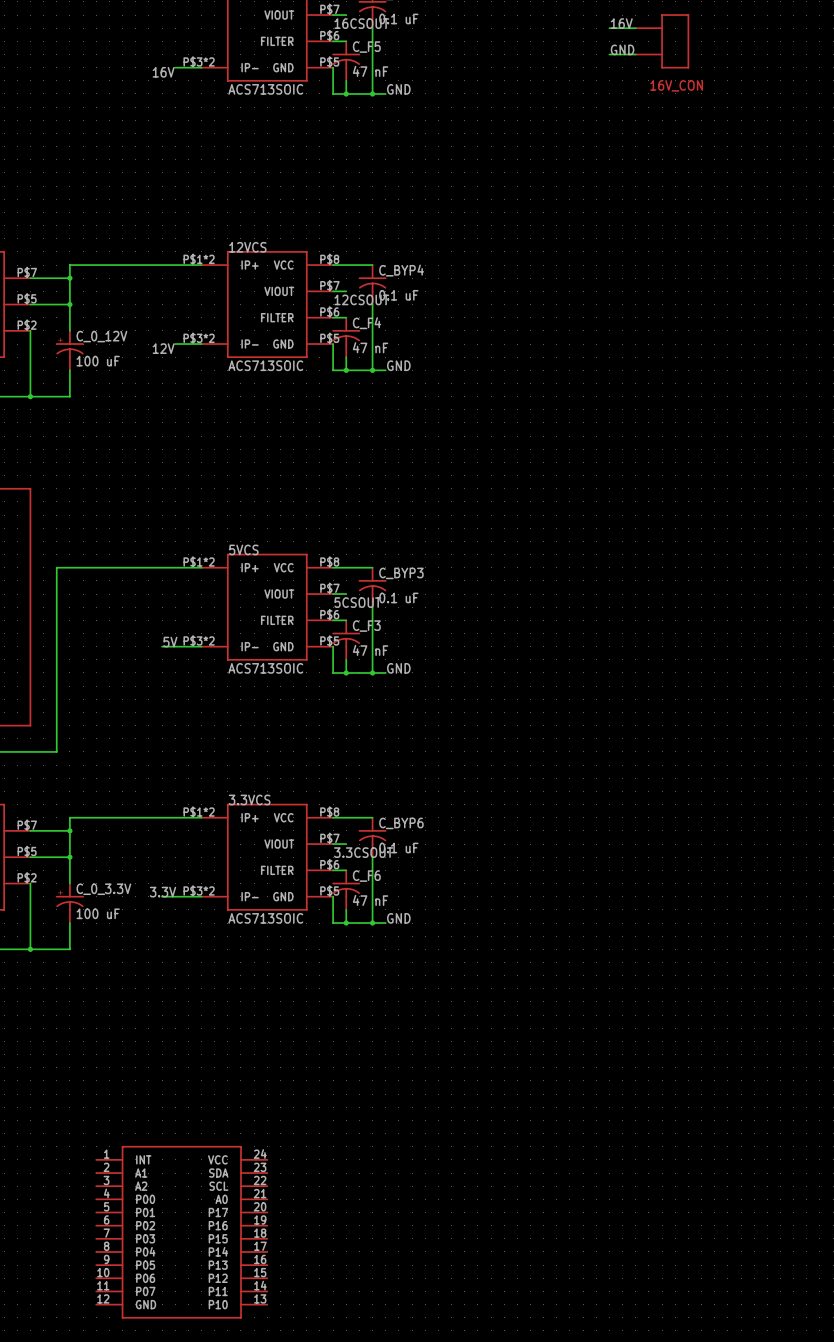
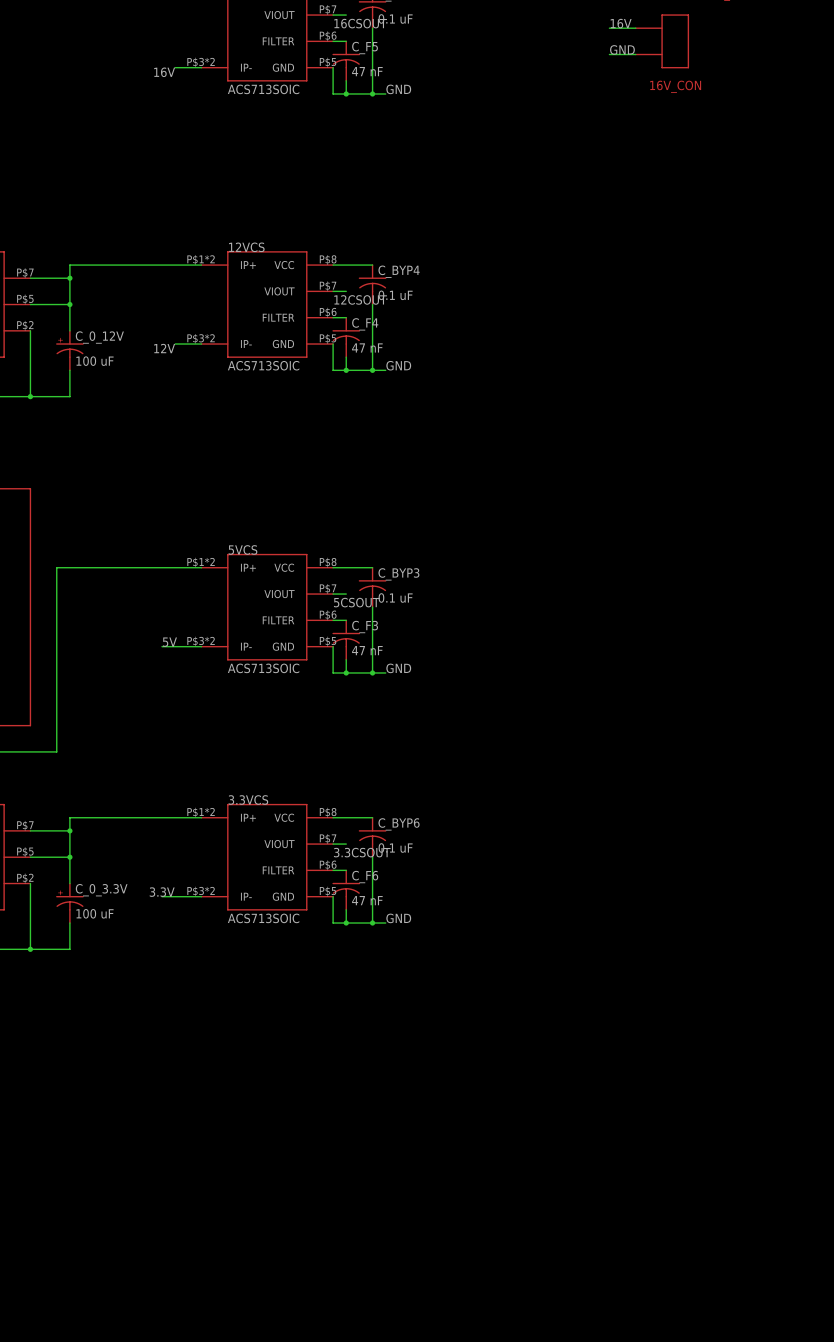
part: (181, 1232) -> none

